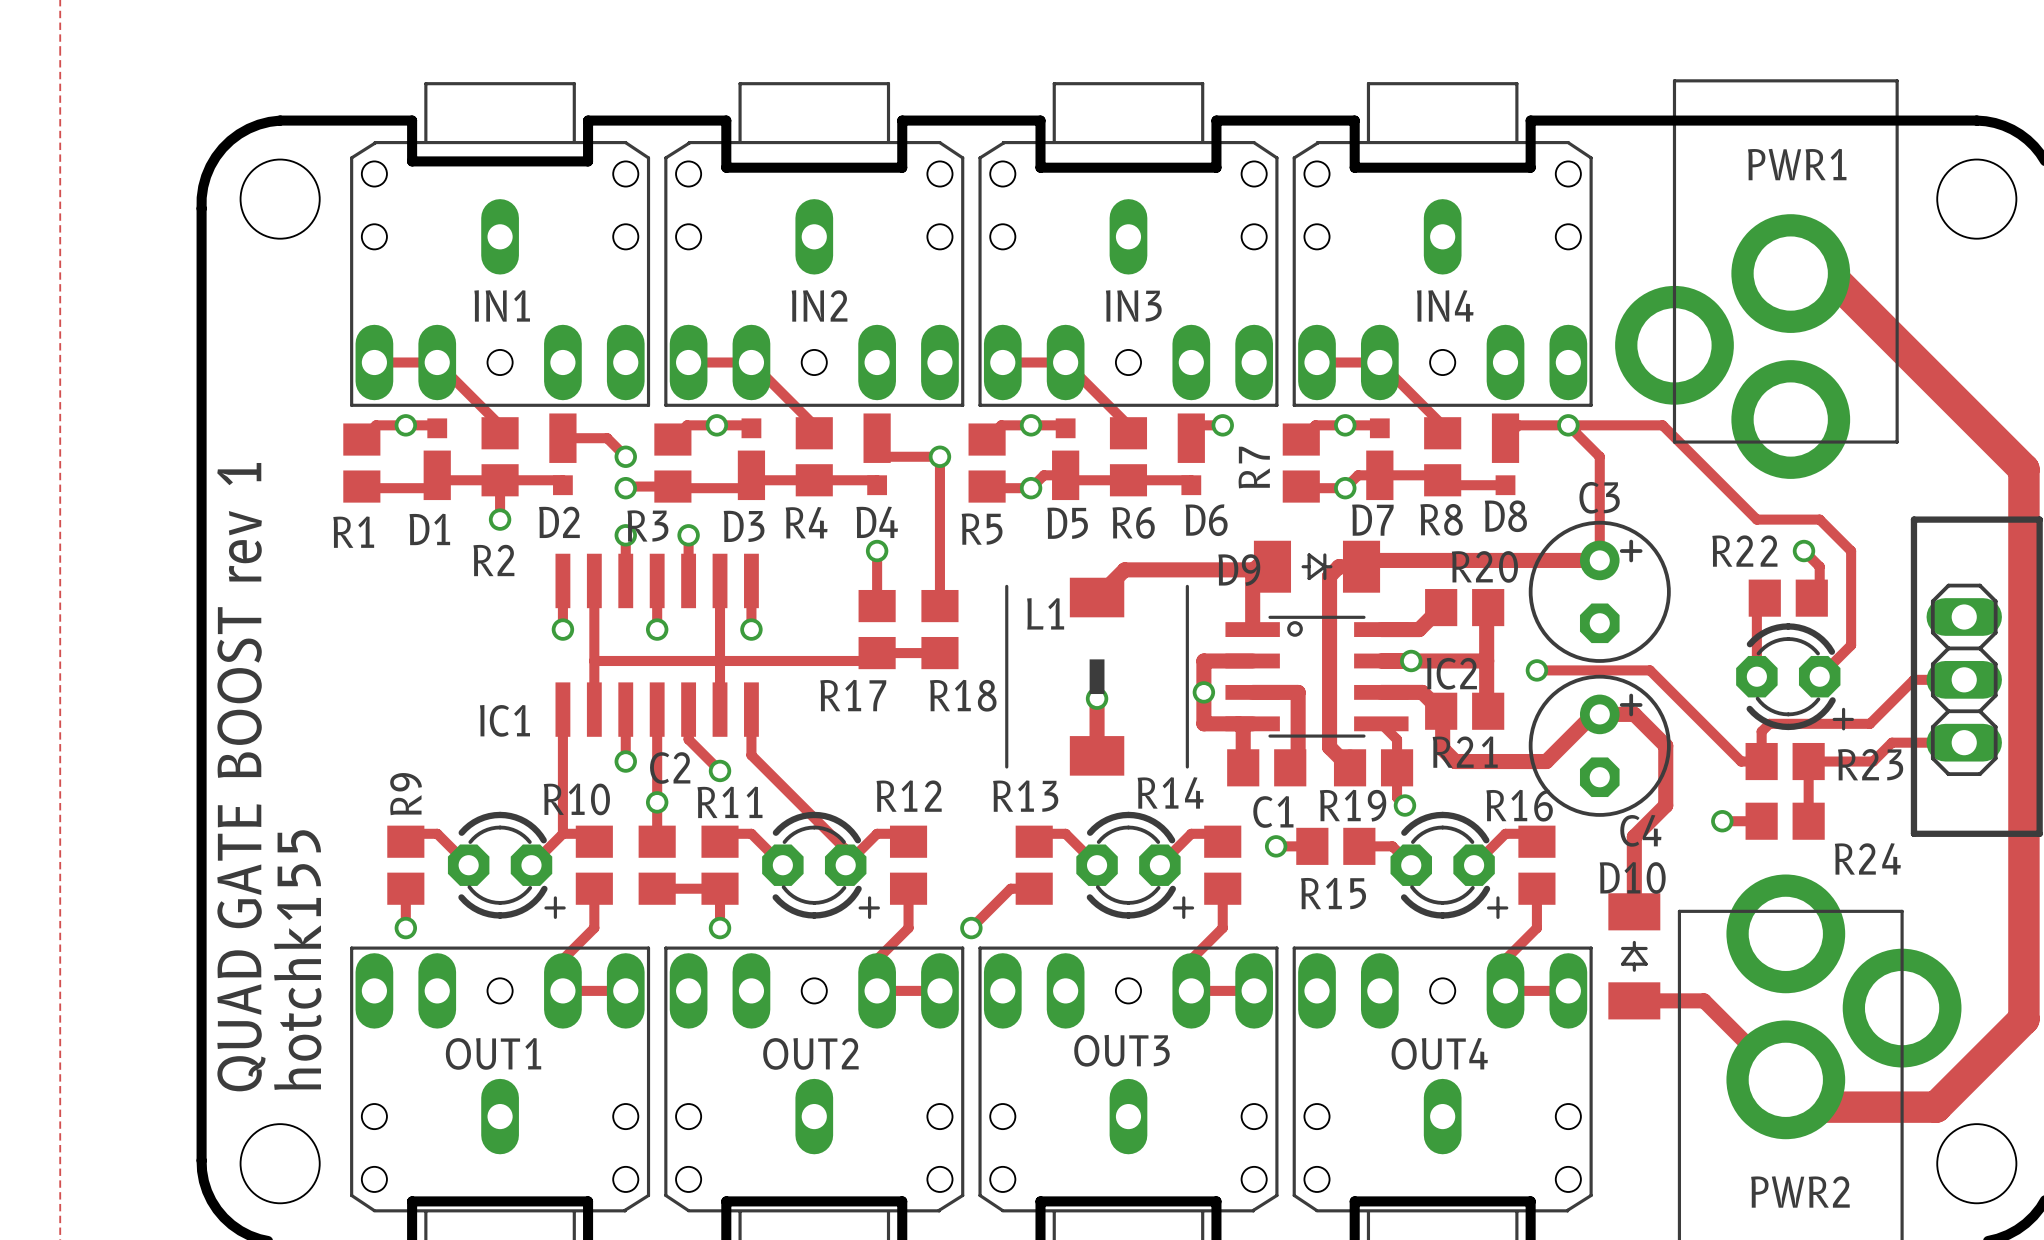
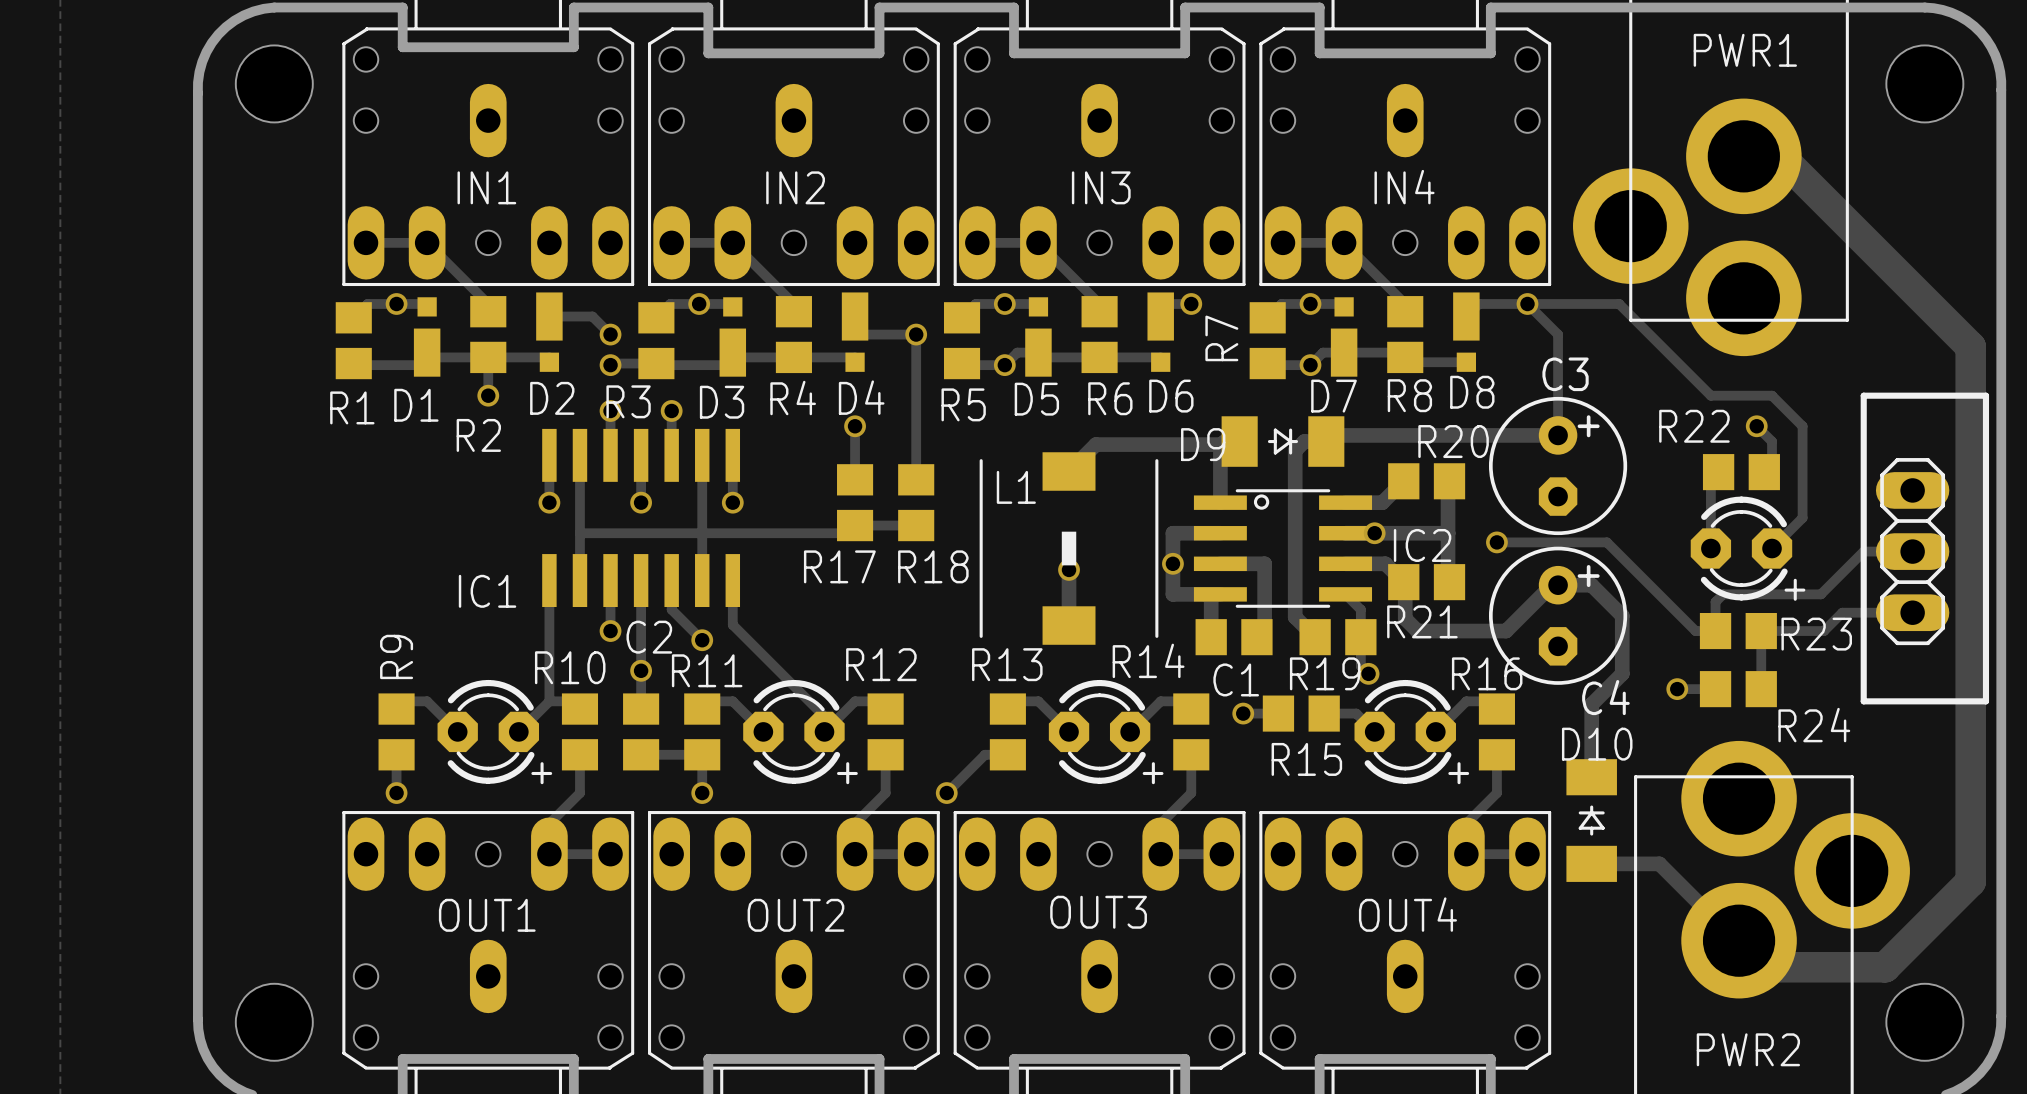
text: QUAD GATE BOOST rev 1 (241, 777) -> none
text: hotchk155 (297, 960) -> none

